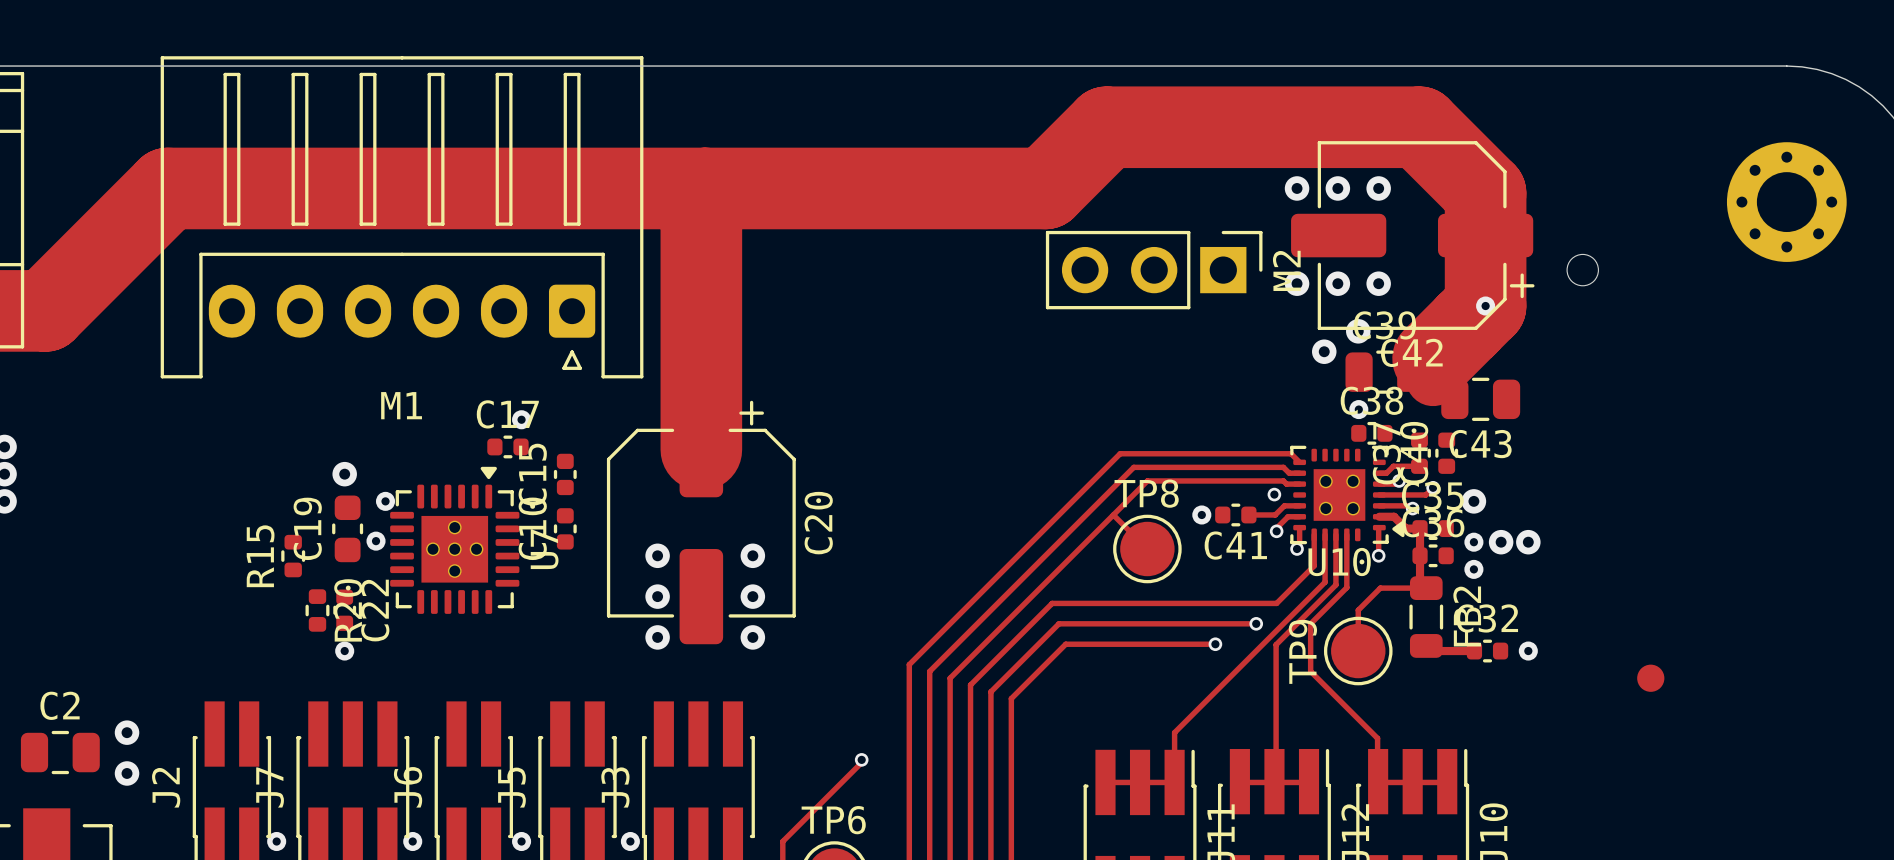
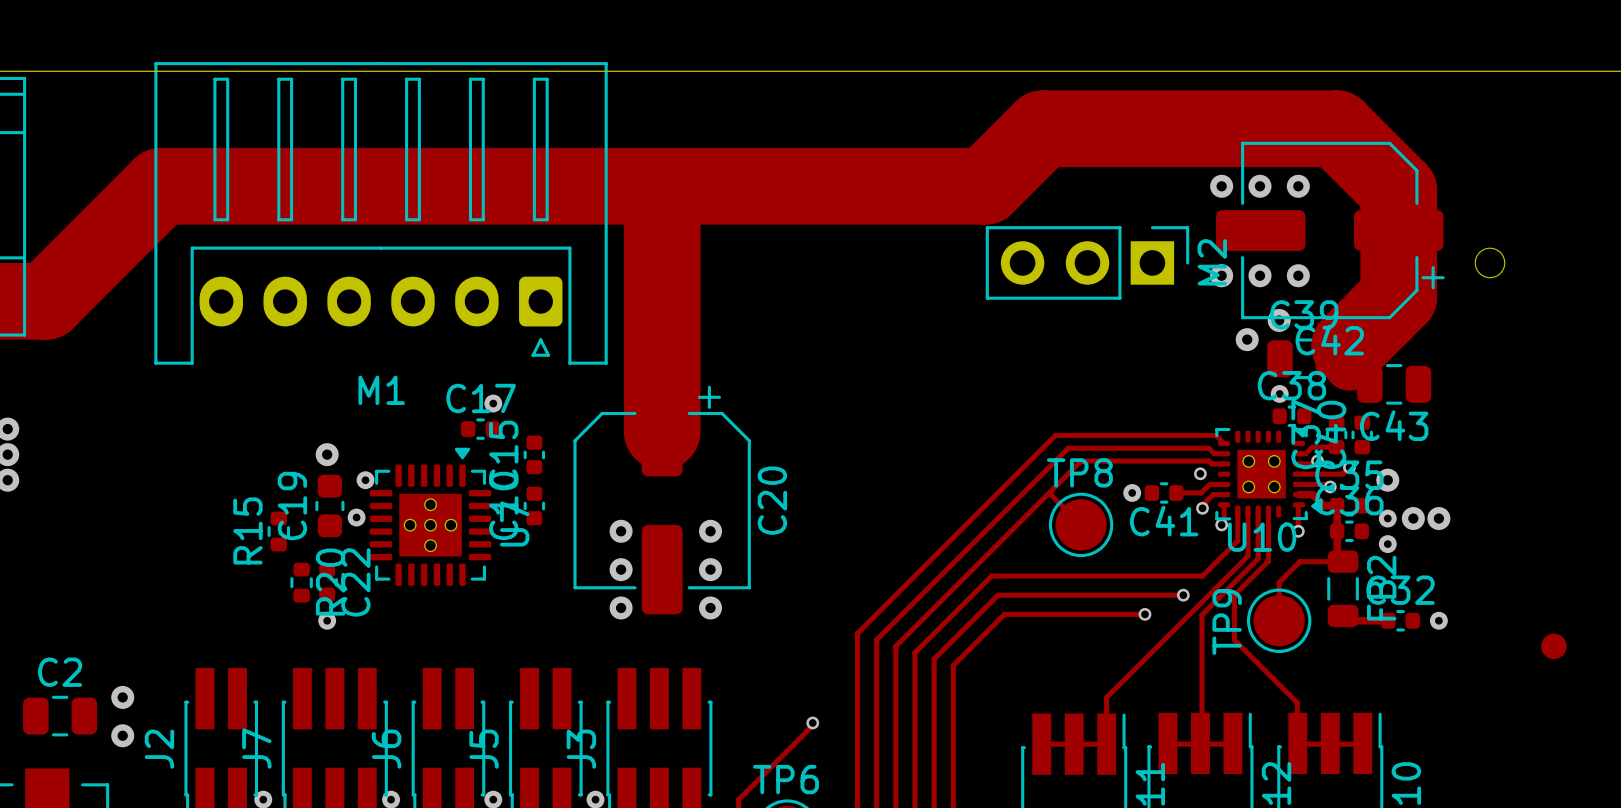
via: (1485, 306) -> none

